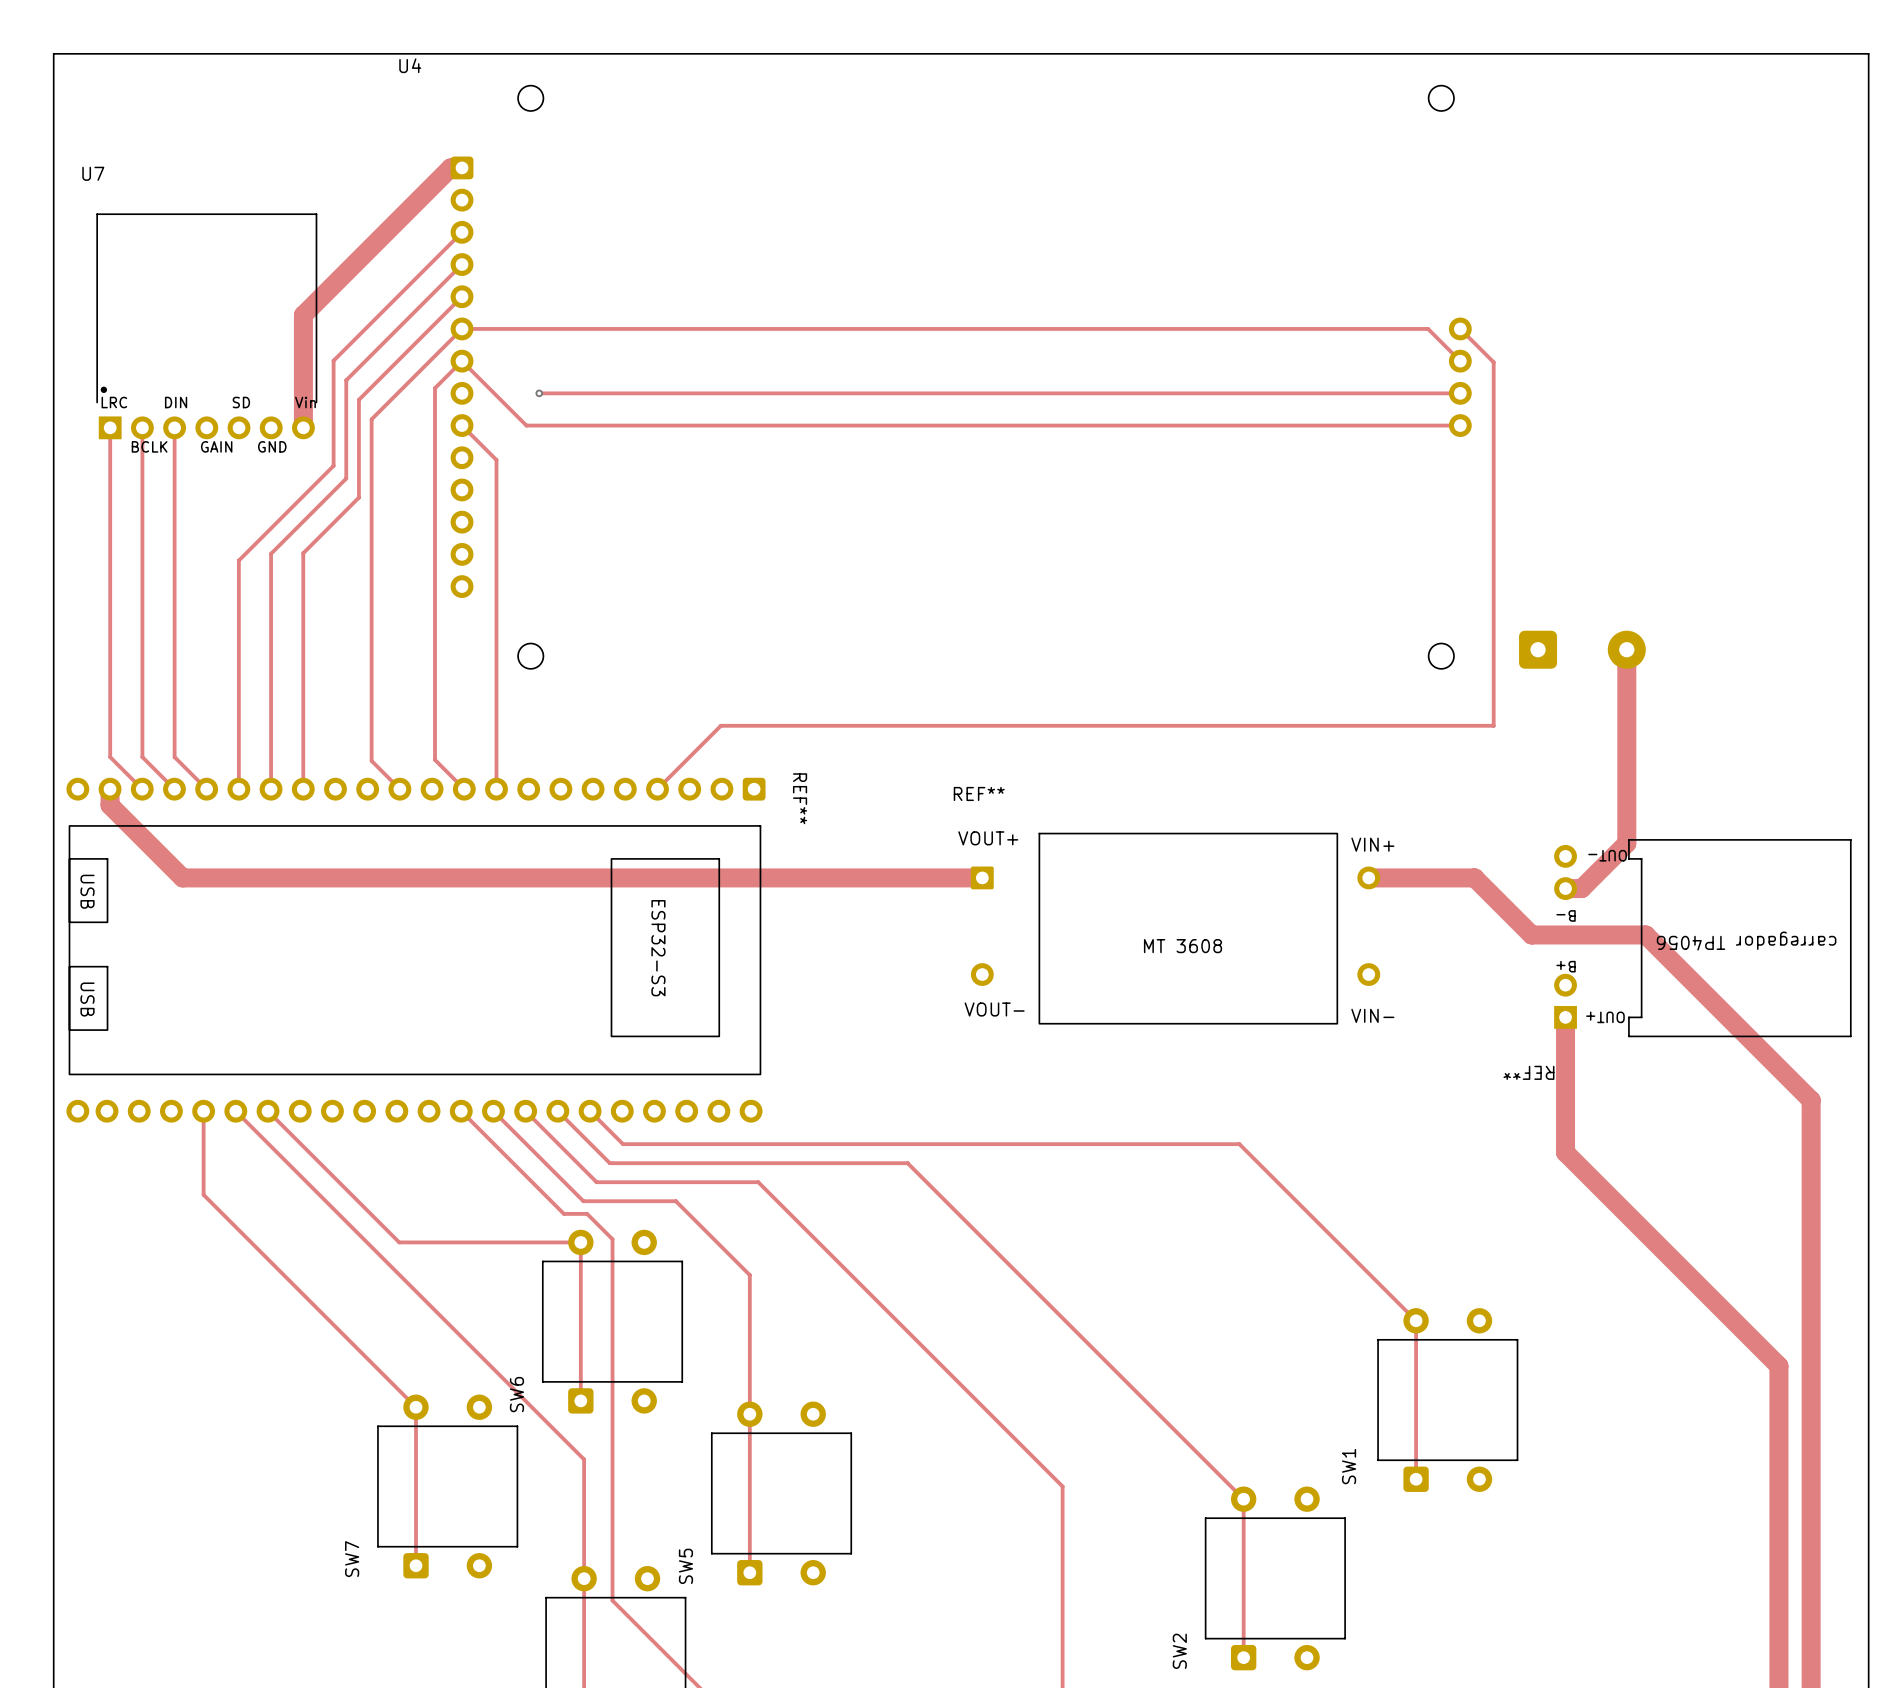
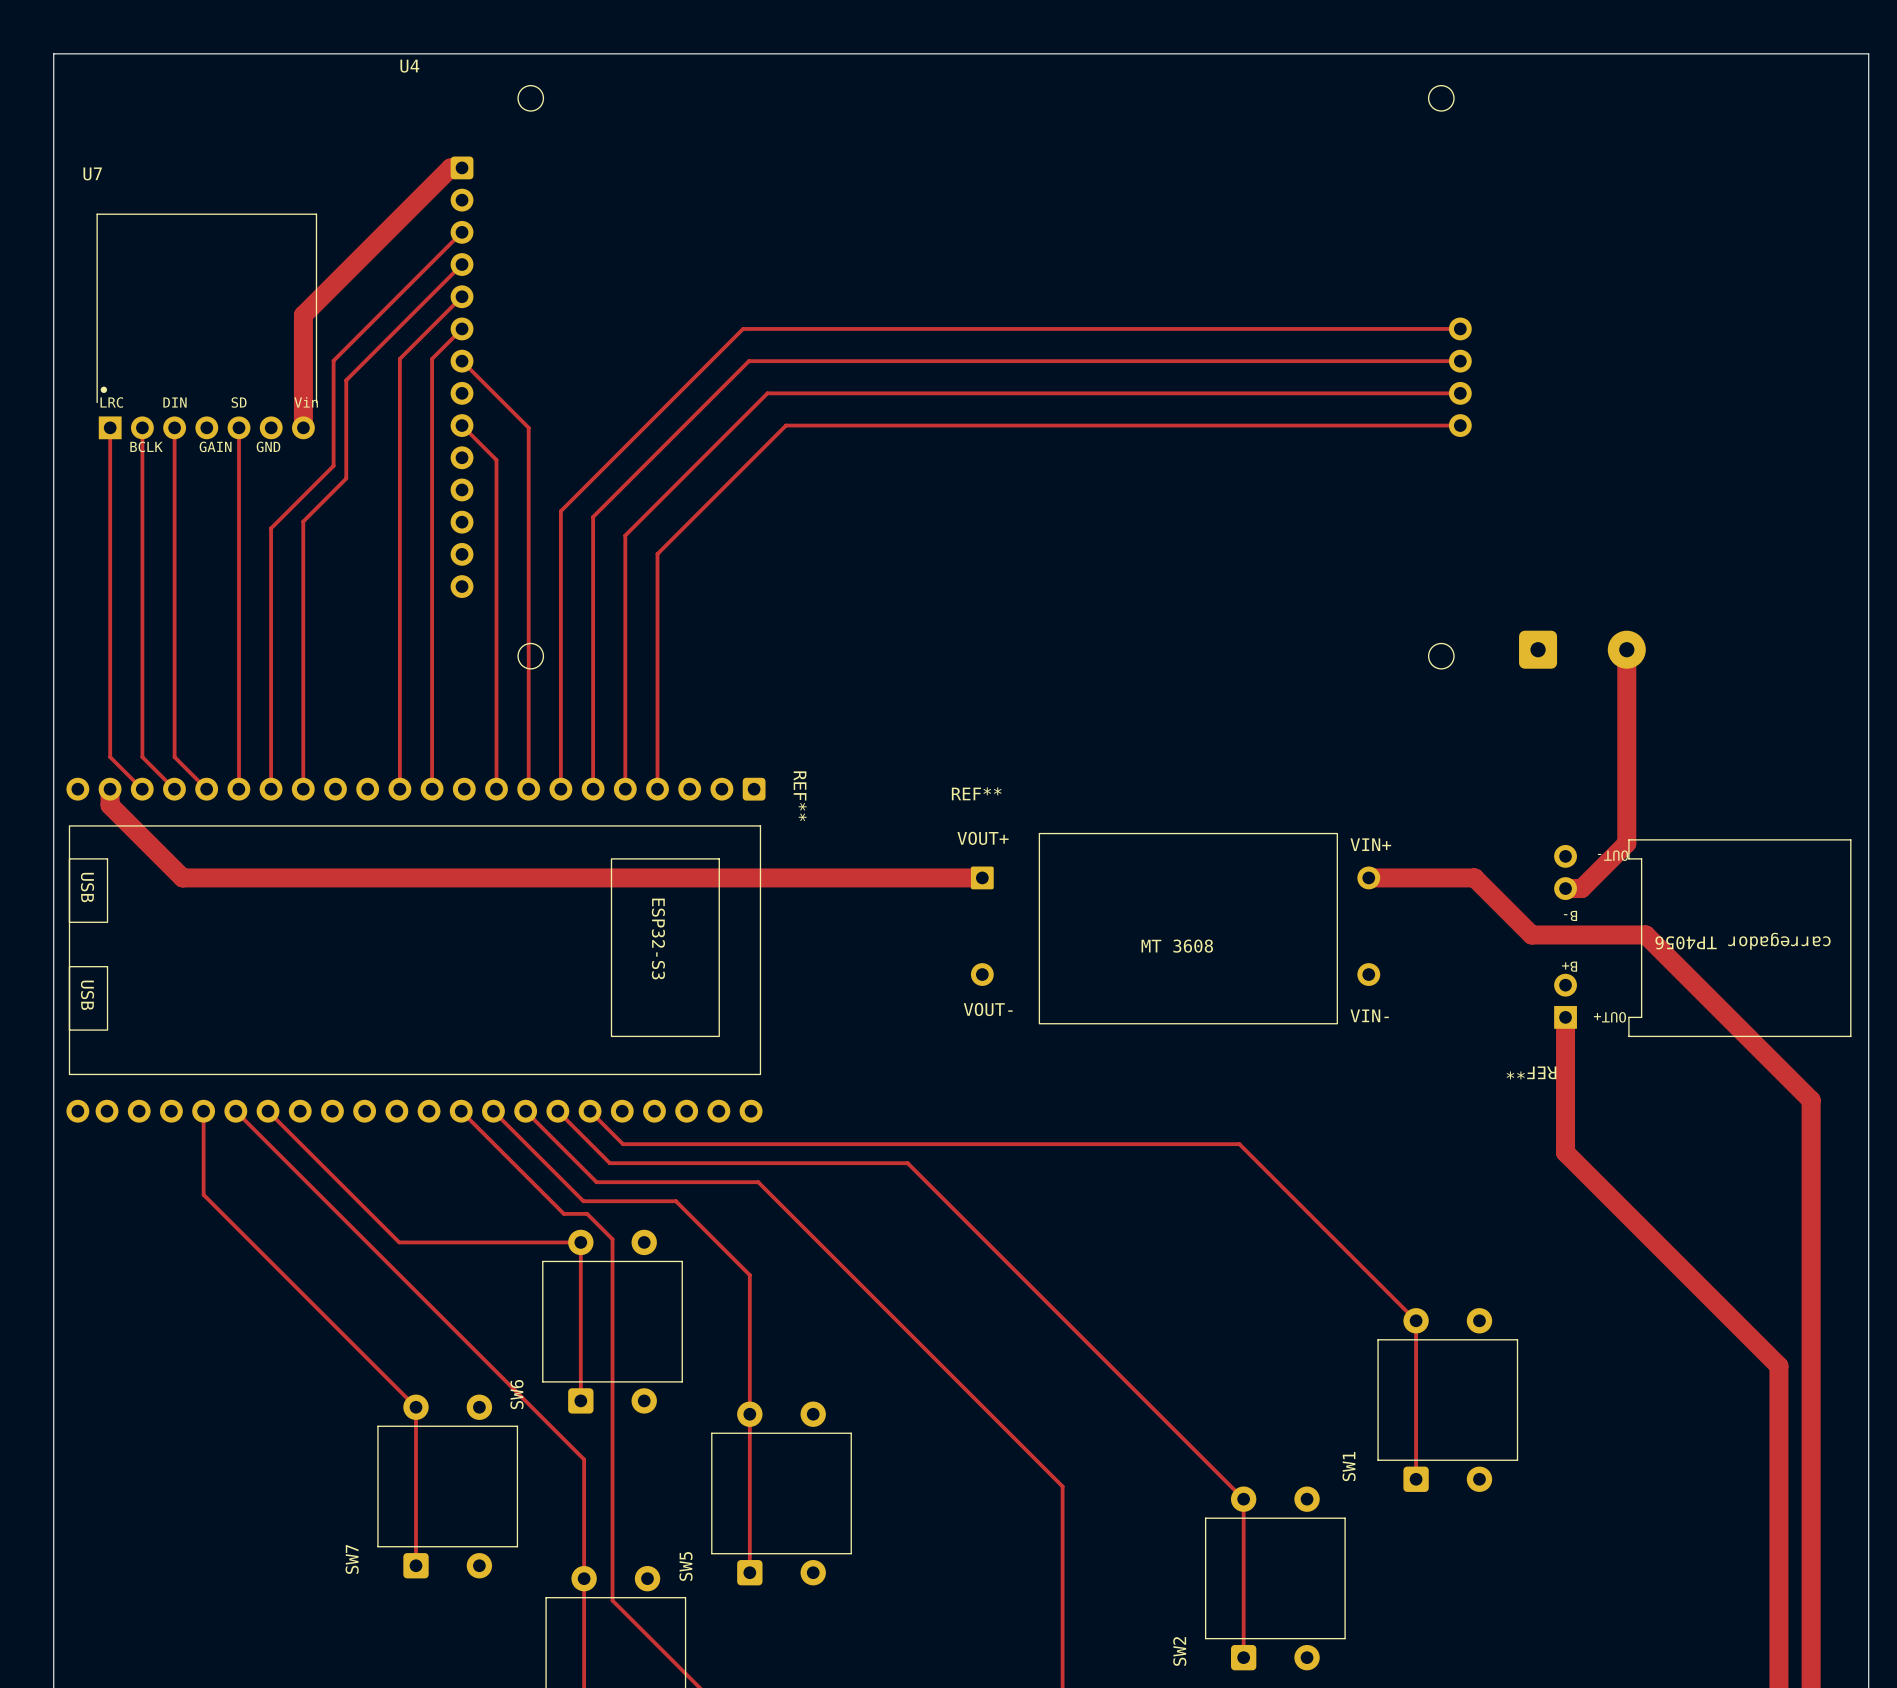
track: (462, 328) (743, 328) -> (560, 789) (560, 511) (743, 328)
track: (1428, 328) (1460, 361) -> (1428, 328) (1460, 328)
track: (1460, 328) (1493, 362) (1493, 725) (720, 725) (657, 789) -> none
track: (399, 358) (358, 399) (358, 497) (303, 553) -> none
track: (432, 358) (371, 419) (371, 760) (399, 789) -> (399, 358) (399, 789)
track: none -> (432, 358) (432, 789)
track: (462, 361) (435, 388) (435, 759) (464, 789) -> none
track: none -> (1460, 361) (748, 361) (593, 516) (593, 789)
track: (539, 393) (767, 393) -> (625, 789) (625, 535) (767, 393)
via: (539, 393) -> none
track: (526, 425) (785, 425) -> (657, 789) (657, 554) (785, 425)
track: none -> (526, 425) (528, 427) (528, 789)
track: (303, 521) (271, 553) -> (303, 521) (303, 553)
track: (271, 528) (238, 560) (238, 789) -> (239, 427) (239, 789)
track: none -> (271, 528) (271, 553)

